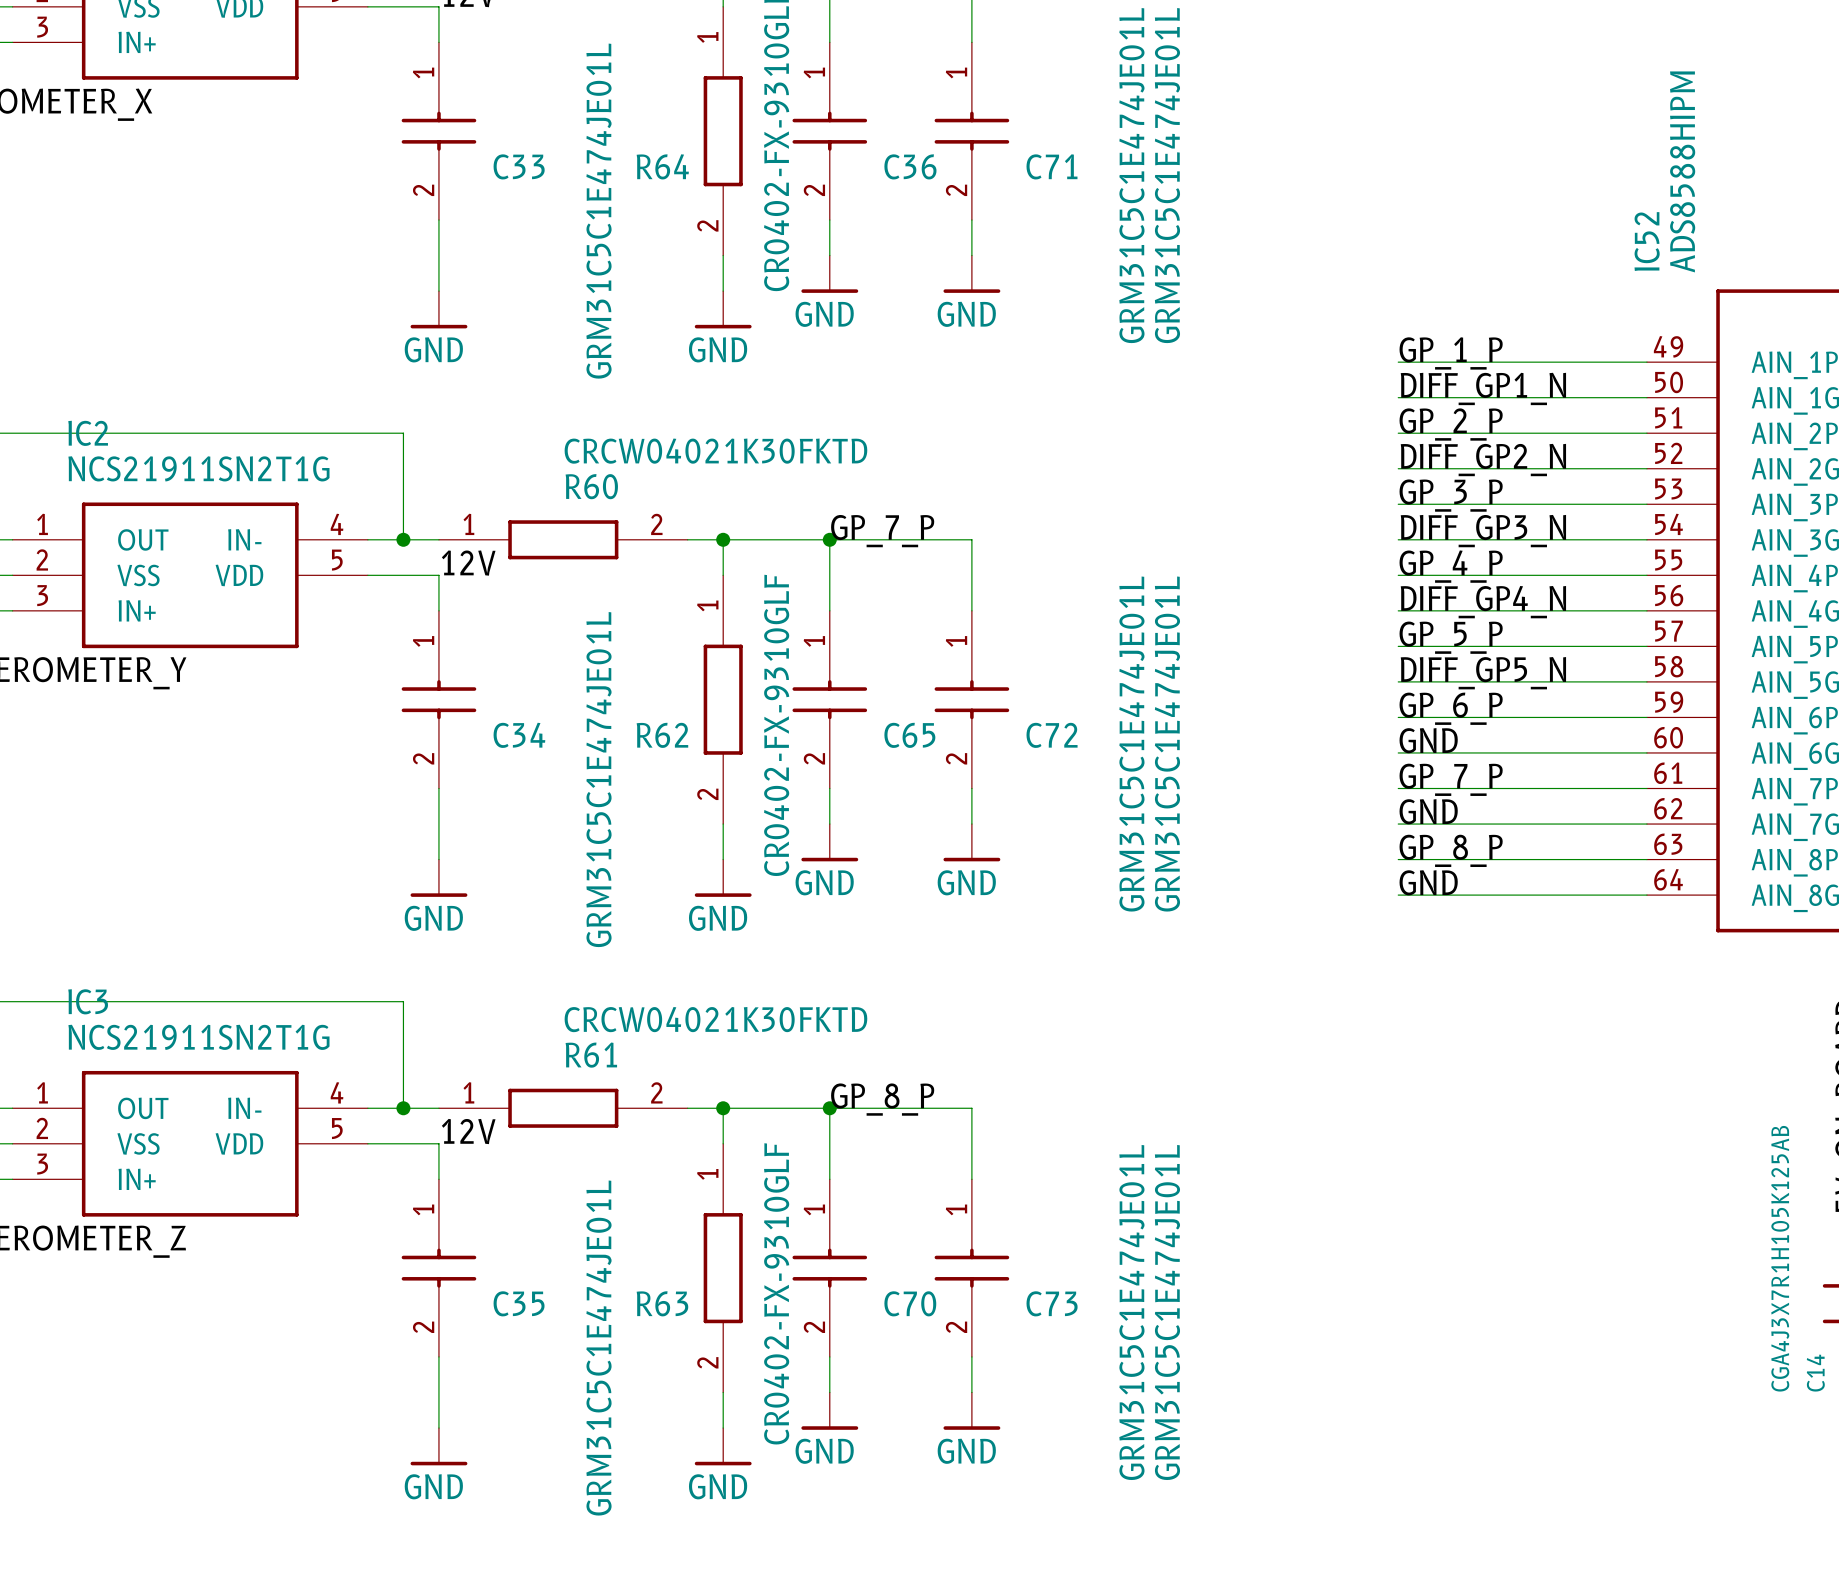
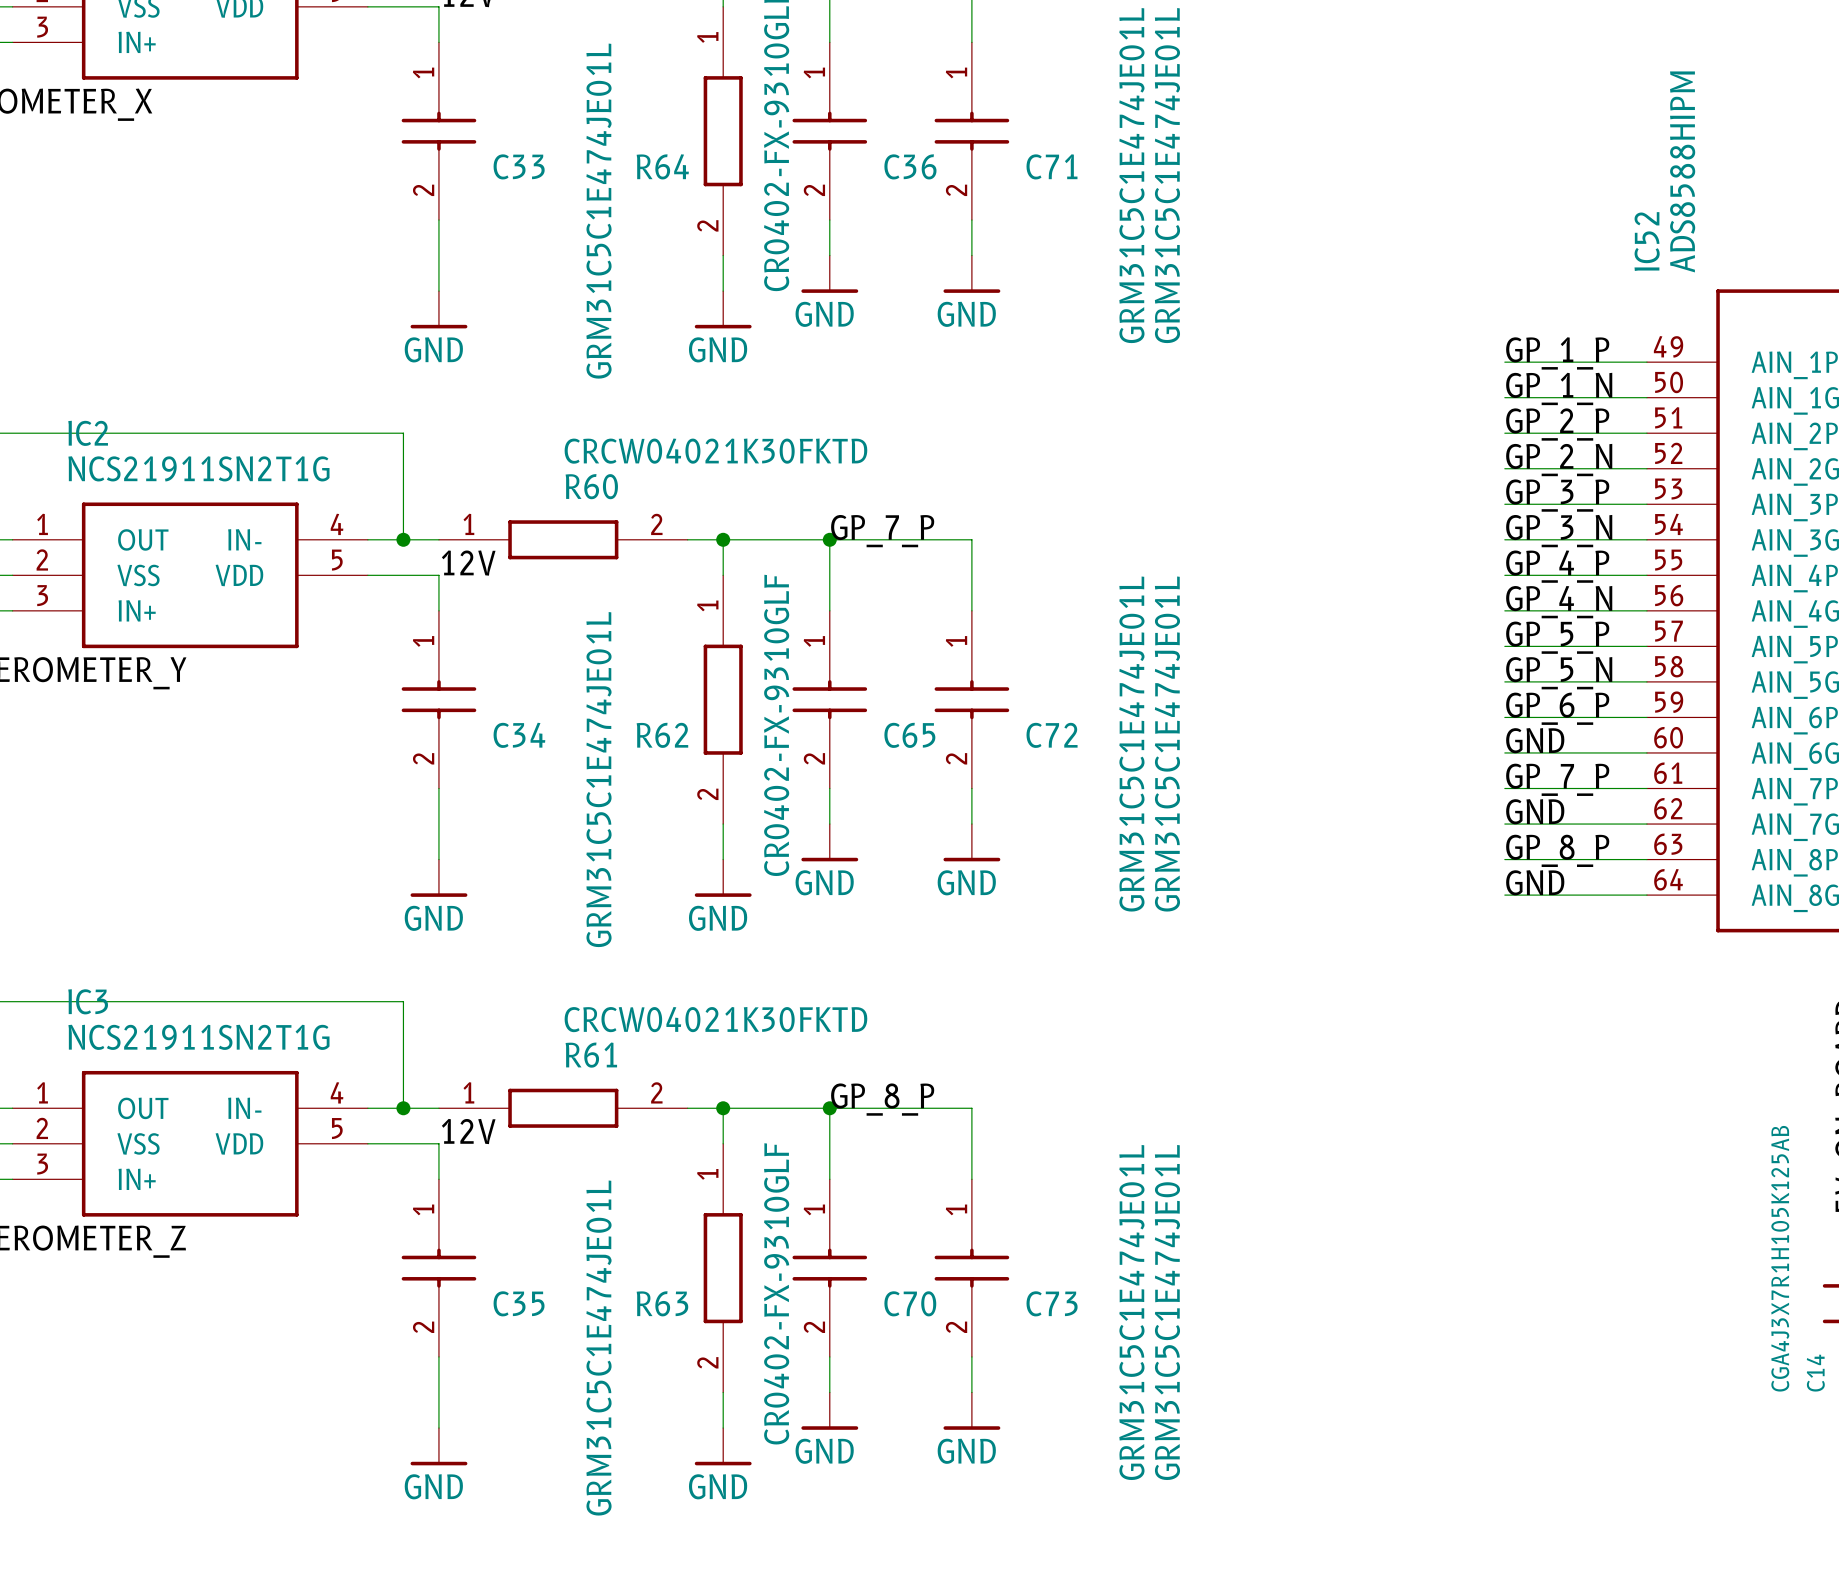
label position: GP_1_P (1451, 353) -> GP_1_P (1557, 353)
wire: (1398, 362) (1504, 362) -> none
label: DIFF_GP1_N (1483, 388) -> GP_1_N (1559, 388)
wire: (1398, 397) (1504, 397) -> none
label position: GP_2_P (1451, 424) -> GP_2_P (1557, 424)
wire: (1398, 433) (1504, 433) -> none
label: DIFF_GP2_N (1483, 460) -> GP_2_N (1559, 460)
wire: (1398, 468) (1504, 468) -> none
label position: GP_3_P (1451, 495) -> GP_3_P (1557, 495)
wire: (1398, 504) (1504, 504) -> none
label: DIFF_GP3_N (1483, 531) -> GP_3_N (1559, 531)
wire: (1398, 539) (1504, 539) -> none
label position: GP_4_P (1451, 566) -> GP_4_P (1557, 566)
wire: (1398, 575) (1504, 575) -> none
label: DIFF_GP4_N (1483, 602) -> GP_4_N (1559, 602)
wire: (1398, 610) (1504, 610) -> none
label position: GP_5_P (1451, 637) -> GP_5_P (1557, 637)
wire: (1398, 646) (1504, 646) -> none
label: DIFF_GP5_N (1483, 673) -> GP_5_N (1559, 673)
wire: (1398, 681) (1504, 681) -> none
label position: GP_6_P (1451, 708) -> GP_6_P (1557, 708)
wire: (1398, 717) (1504, 717) -> none
label: GND (1428, 740) -> none
label: none -> GND (1535, 740)
wire: (1398, 752) (1504, 752) -> none
label position: GP_7_P (1451, 779) -> GP_7_P (1557, 779)
wire: (1398, 788) (1504, 788) -> none
label: GND (1428, 811) -> none
label: none -> GND (1535, 811)
wire: (1398, 824) (1504, 824) -> none
label position: GP_8_P (1451, 850) -> GP_8_P (1557, 850)
wire: (1398, 859) (1504, 859) -> none
label: GND (1428, 882) -> none
label: none -> GND (1535, 882)
wire: (1398, 895) (1504, 895) -> none

